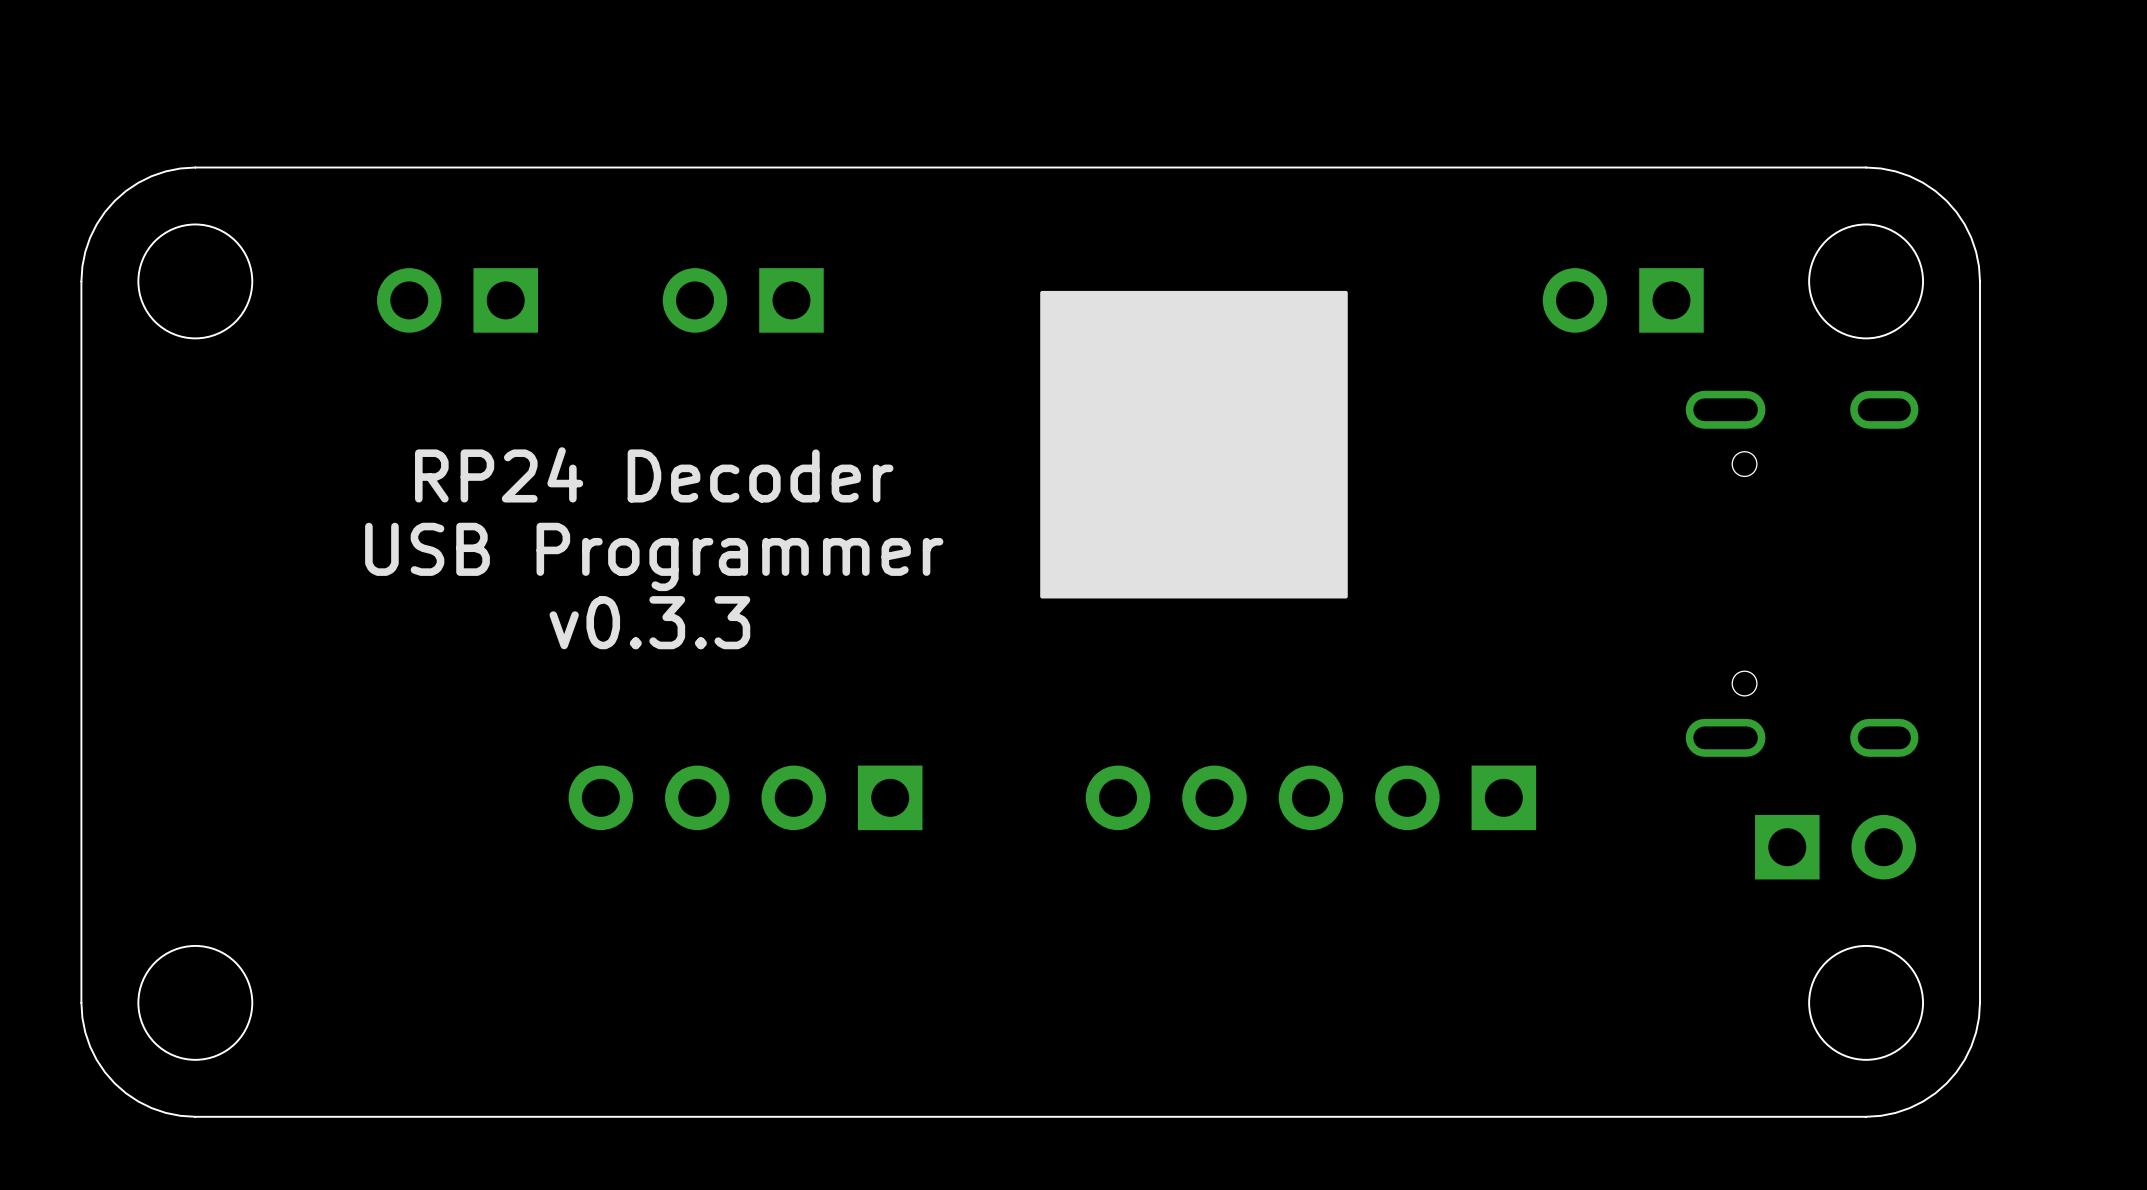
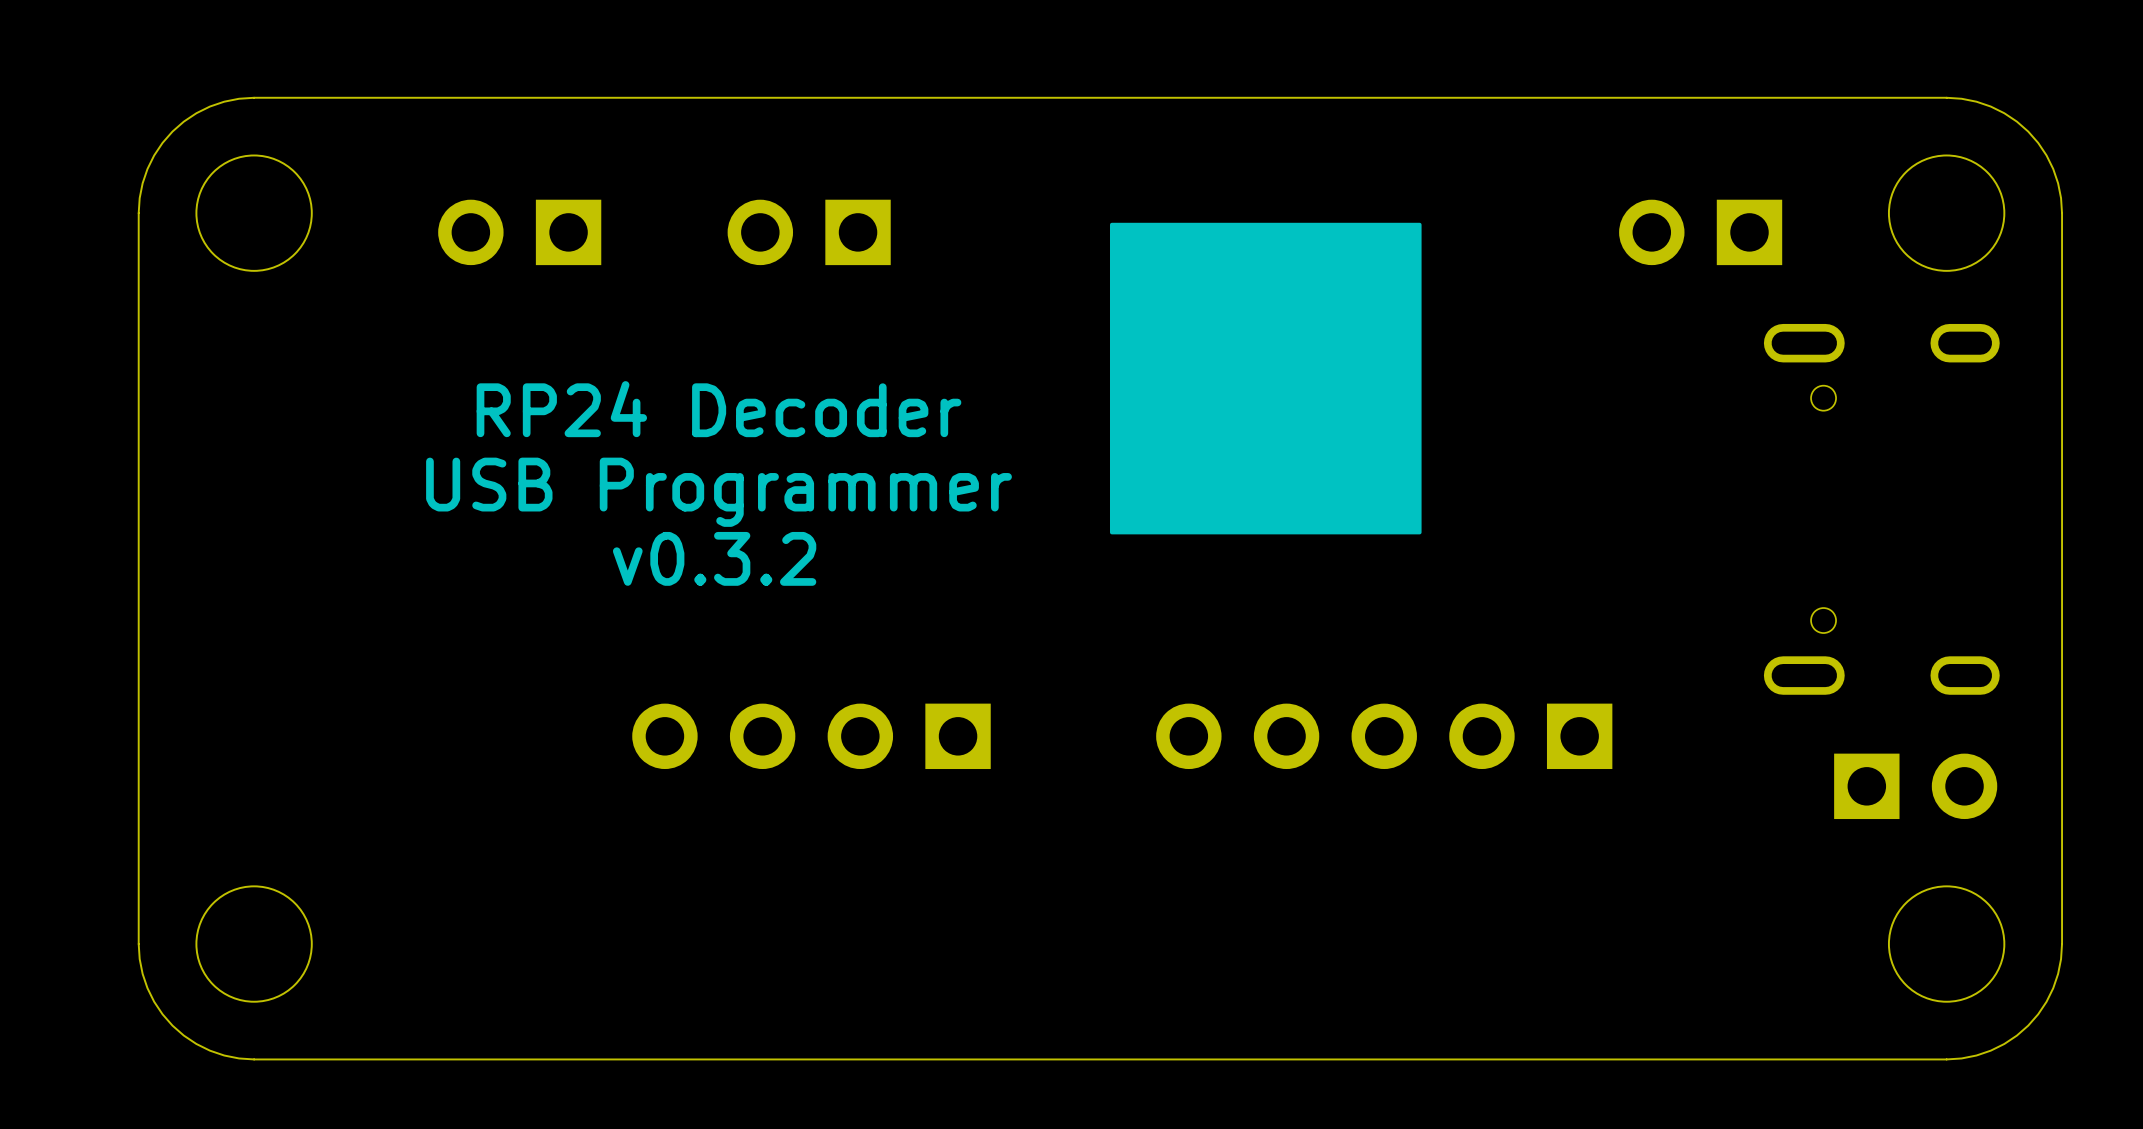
text: v0.3.3 (649, 622) -> v0.3.2 (714, 558)

